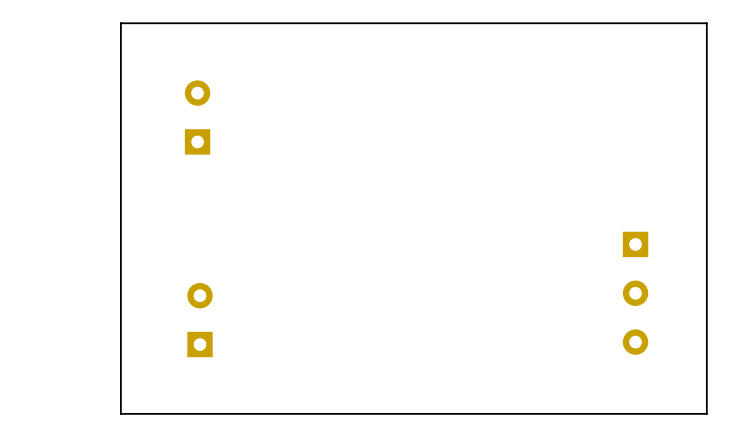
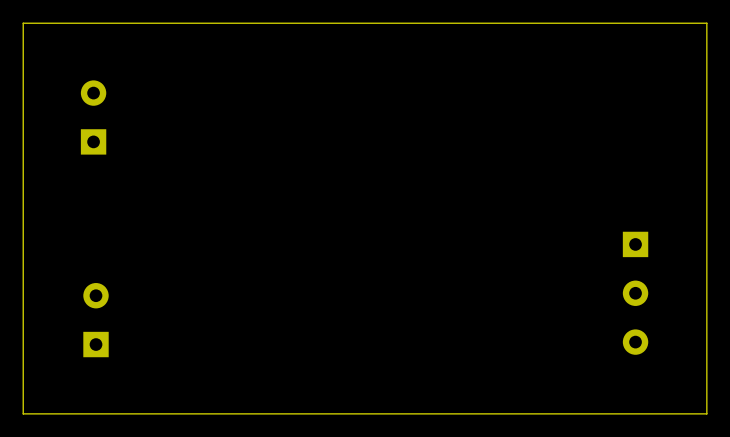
board edge: (120, 23) (120, 413) -> (120, 23) (23, 23) (23, 413) (120, 413)
part position: (197, 117) -> (93, 117)
part position: (200, 320) -> (96, 320)

